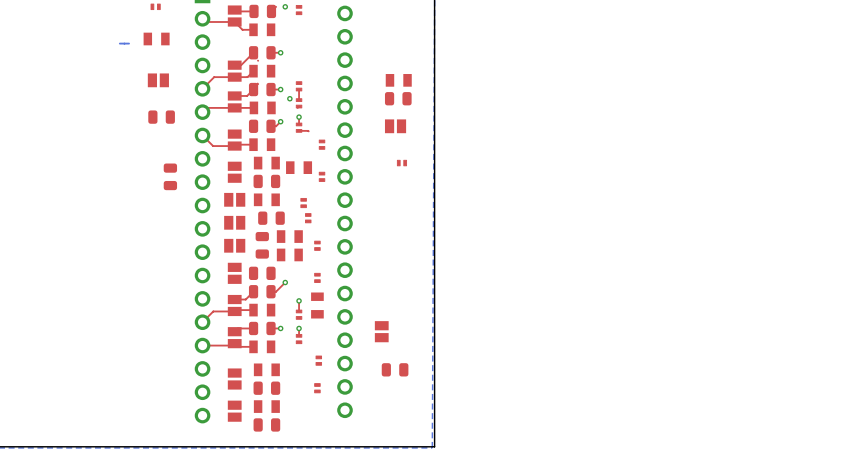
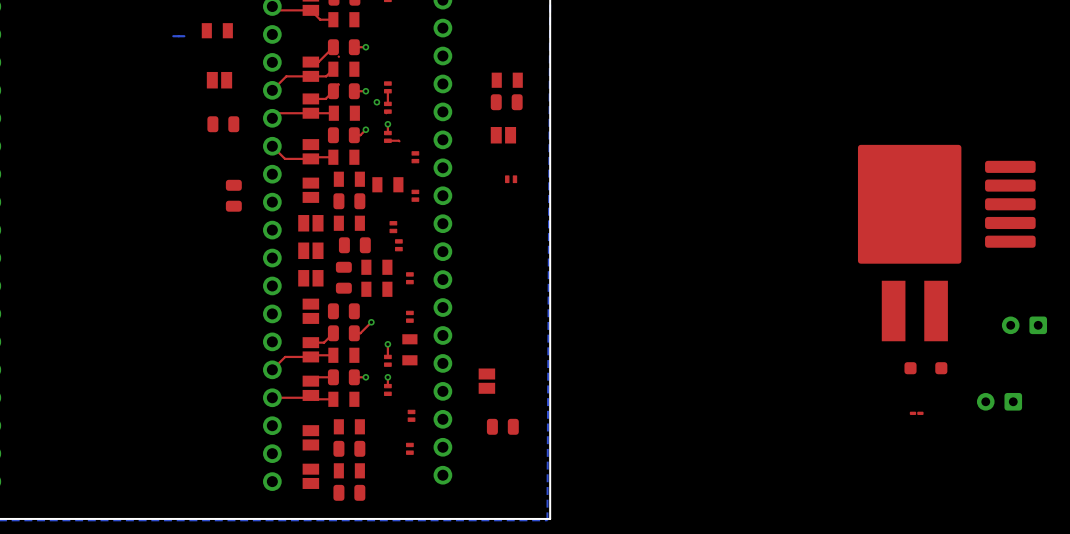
part: none -> (946, 204)
part: none -> (914, 311)
part: none -> (1024, 325)
part: none -> (925, 368)
part: none -> (999, 401)
part: none -> (916, 413)

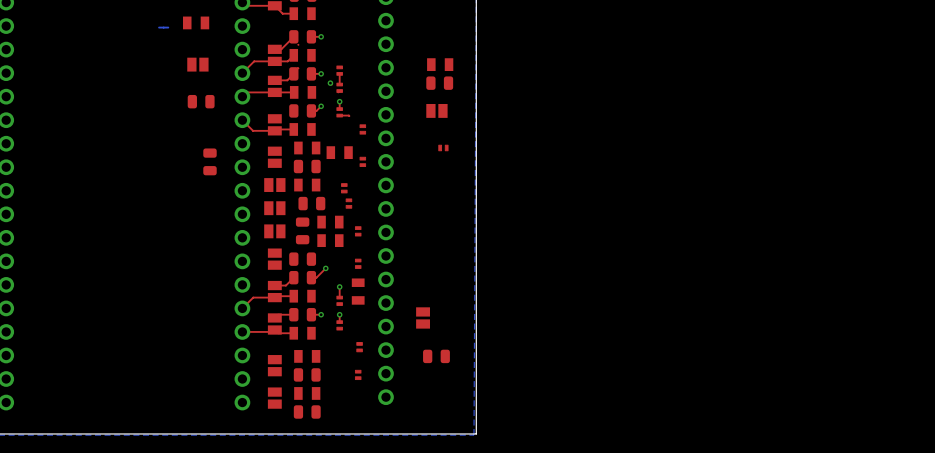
part: (946, 204) -> none
part: (914, 311) -> none
part: (1024, 325) -> none
part: (925, 368) -> none
part: (999, 401) -> none
part: (916, 413) -> none

